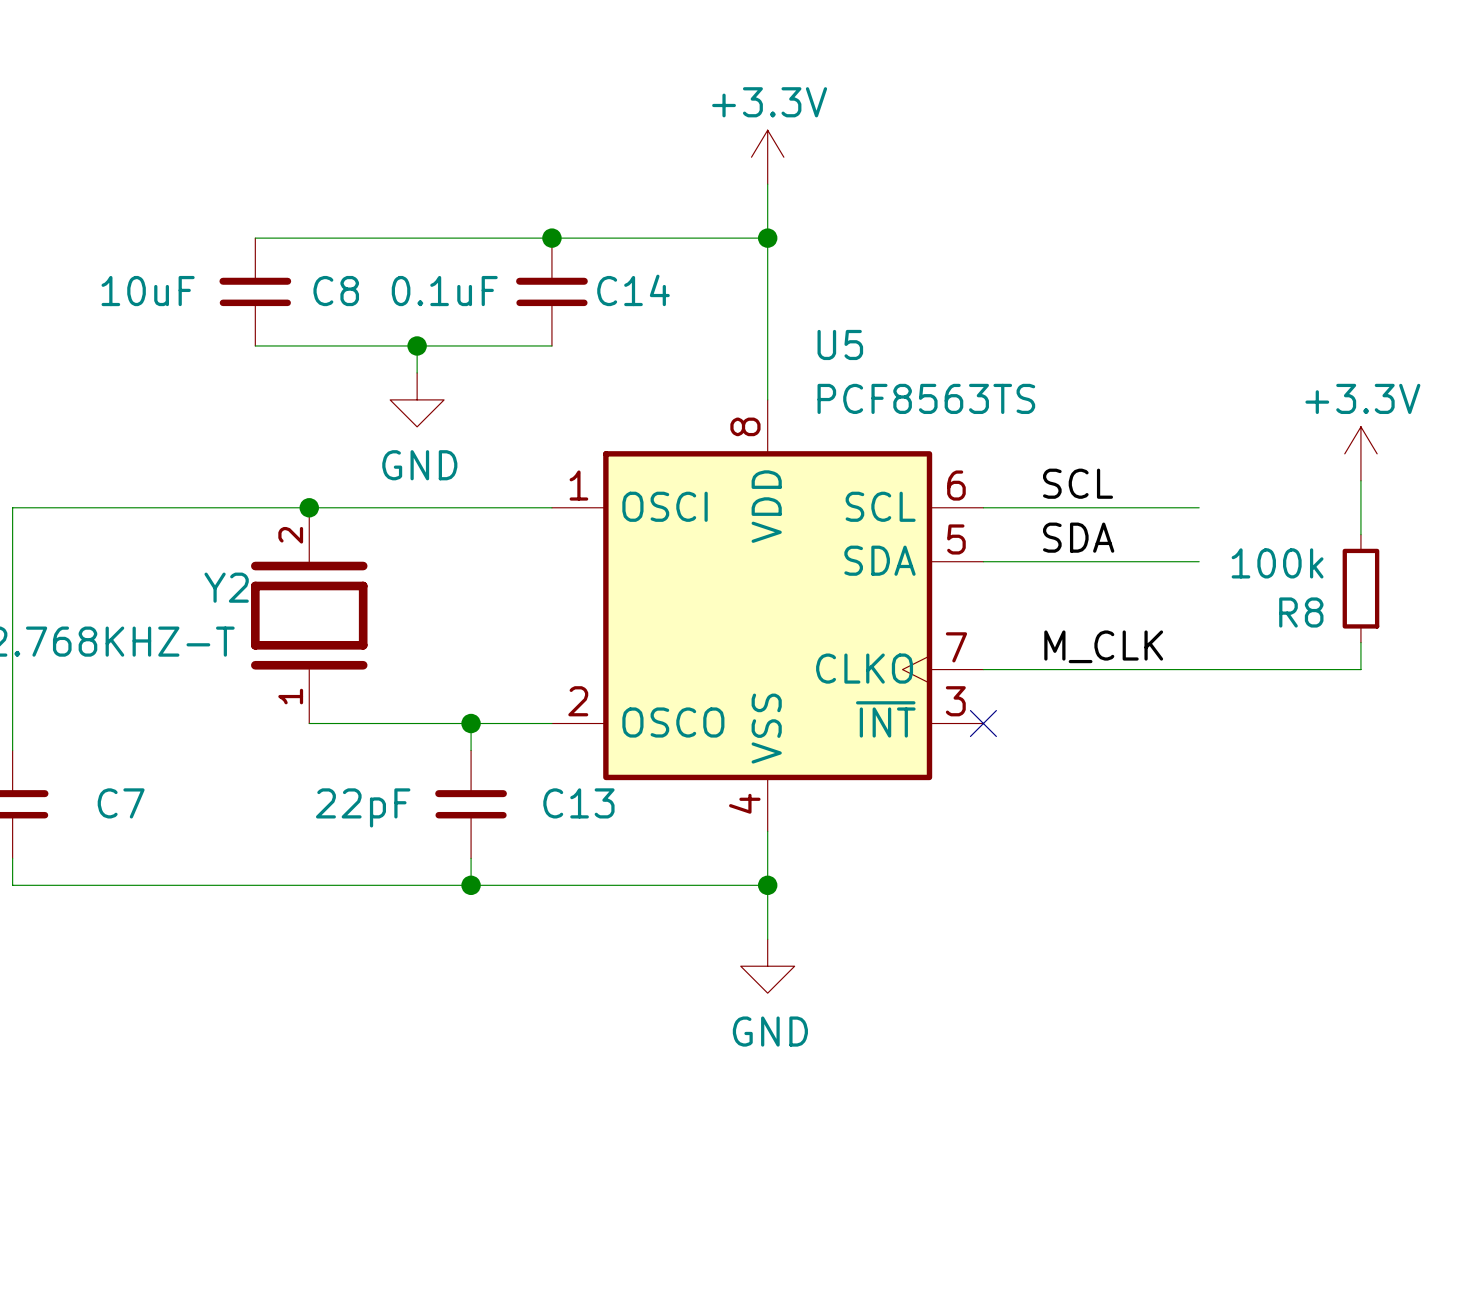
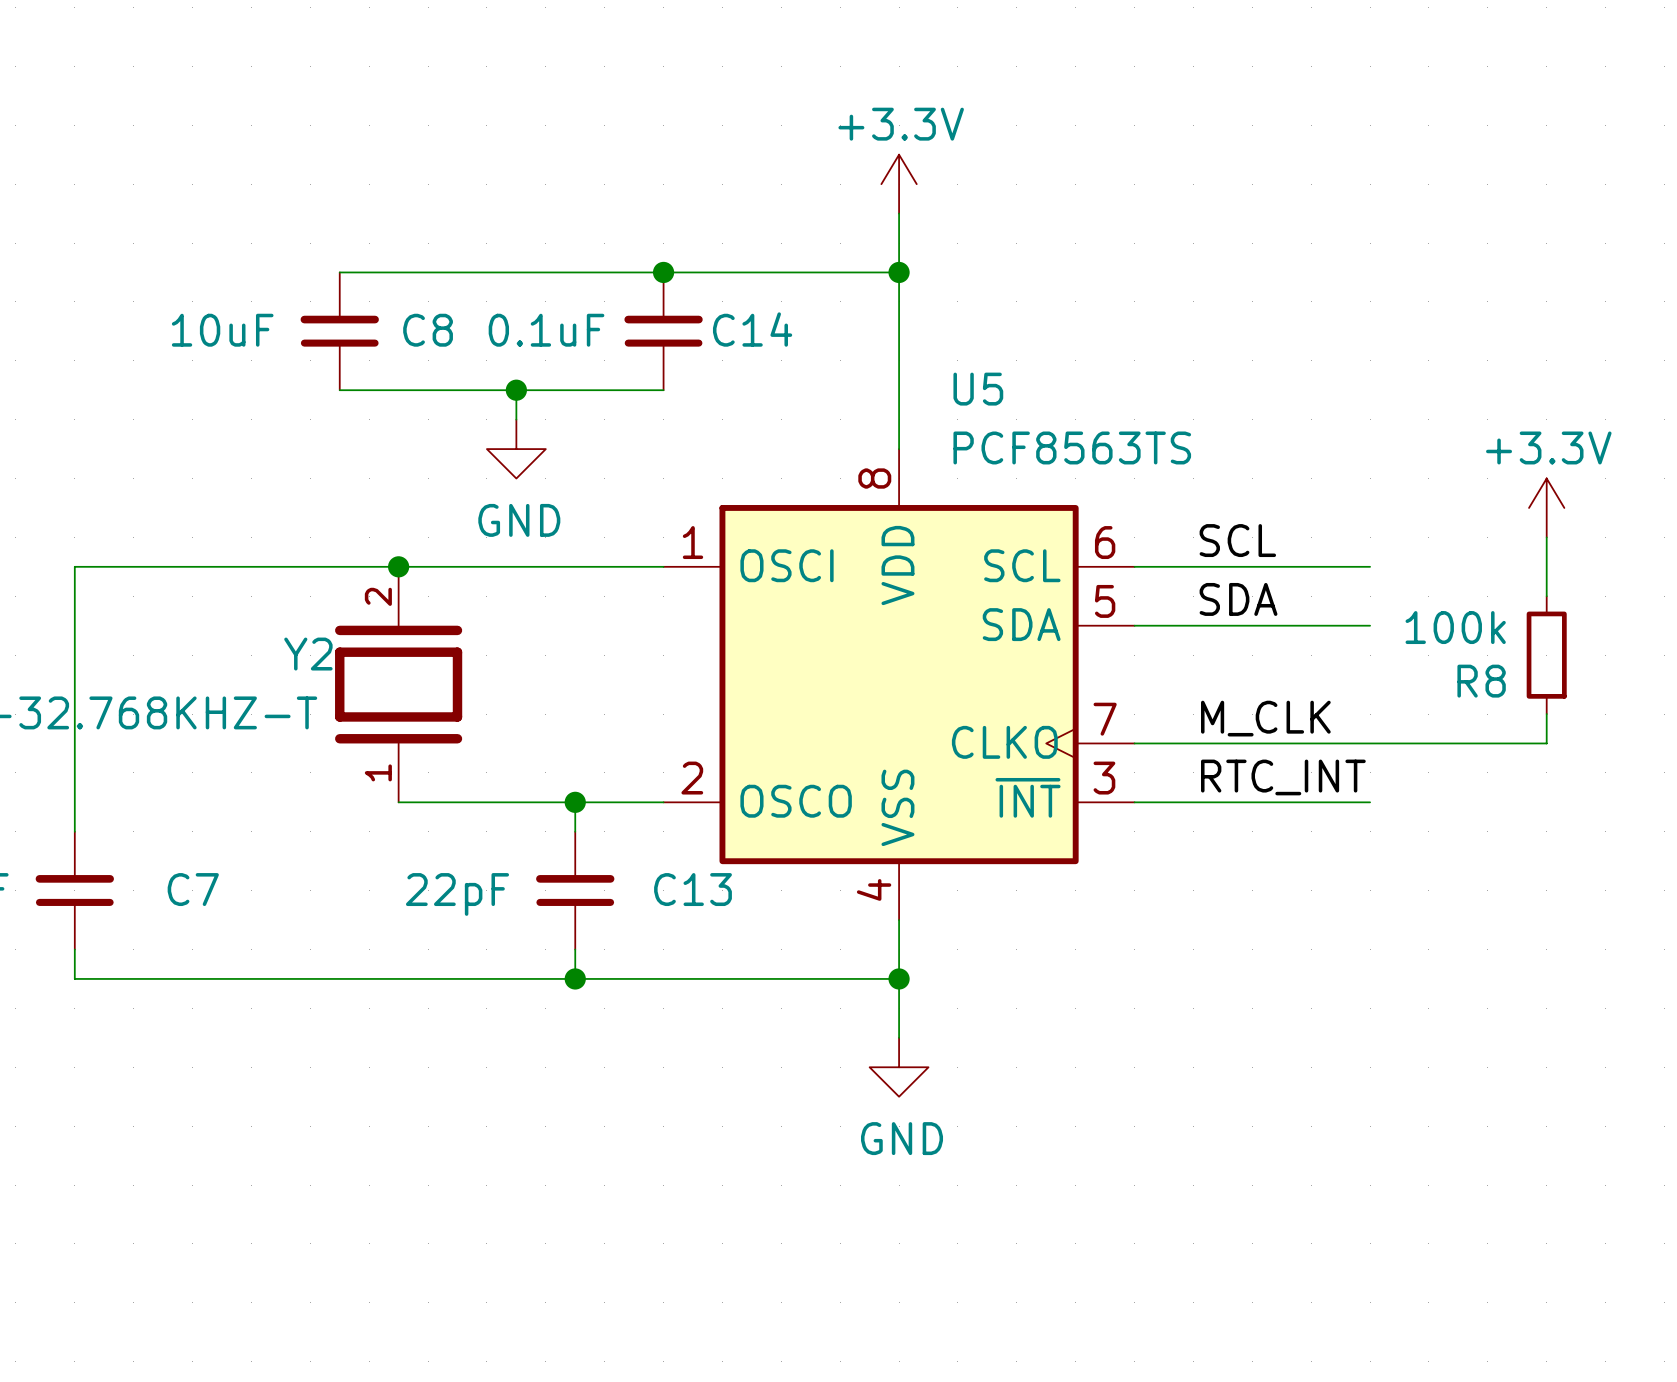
label: none -> RTC_INT (1283, 777)
wire: none -> (1134, 802) (1370, 802)
no-connect mark: (983, 723) -> none

